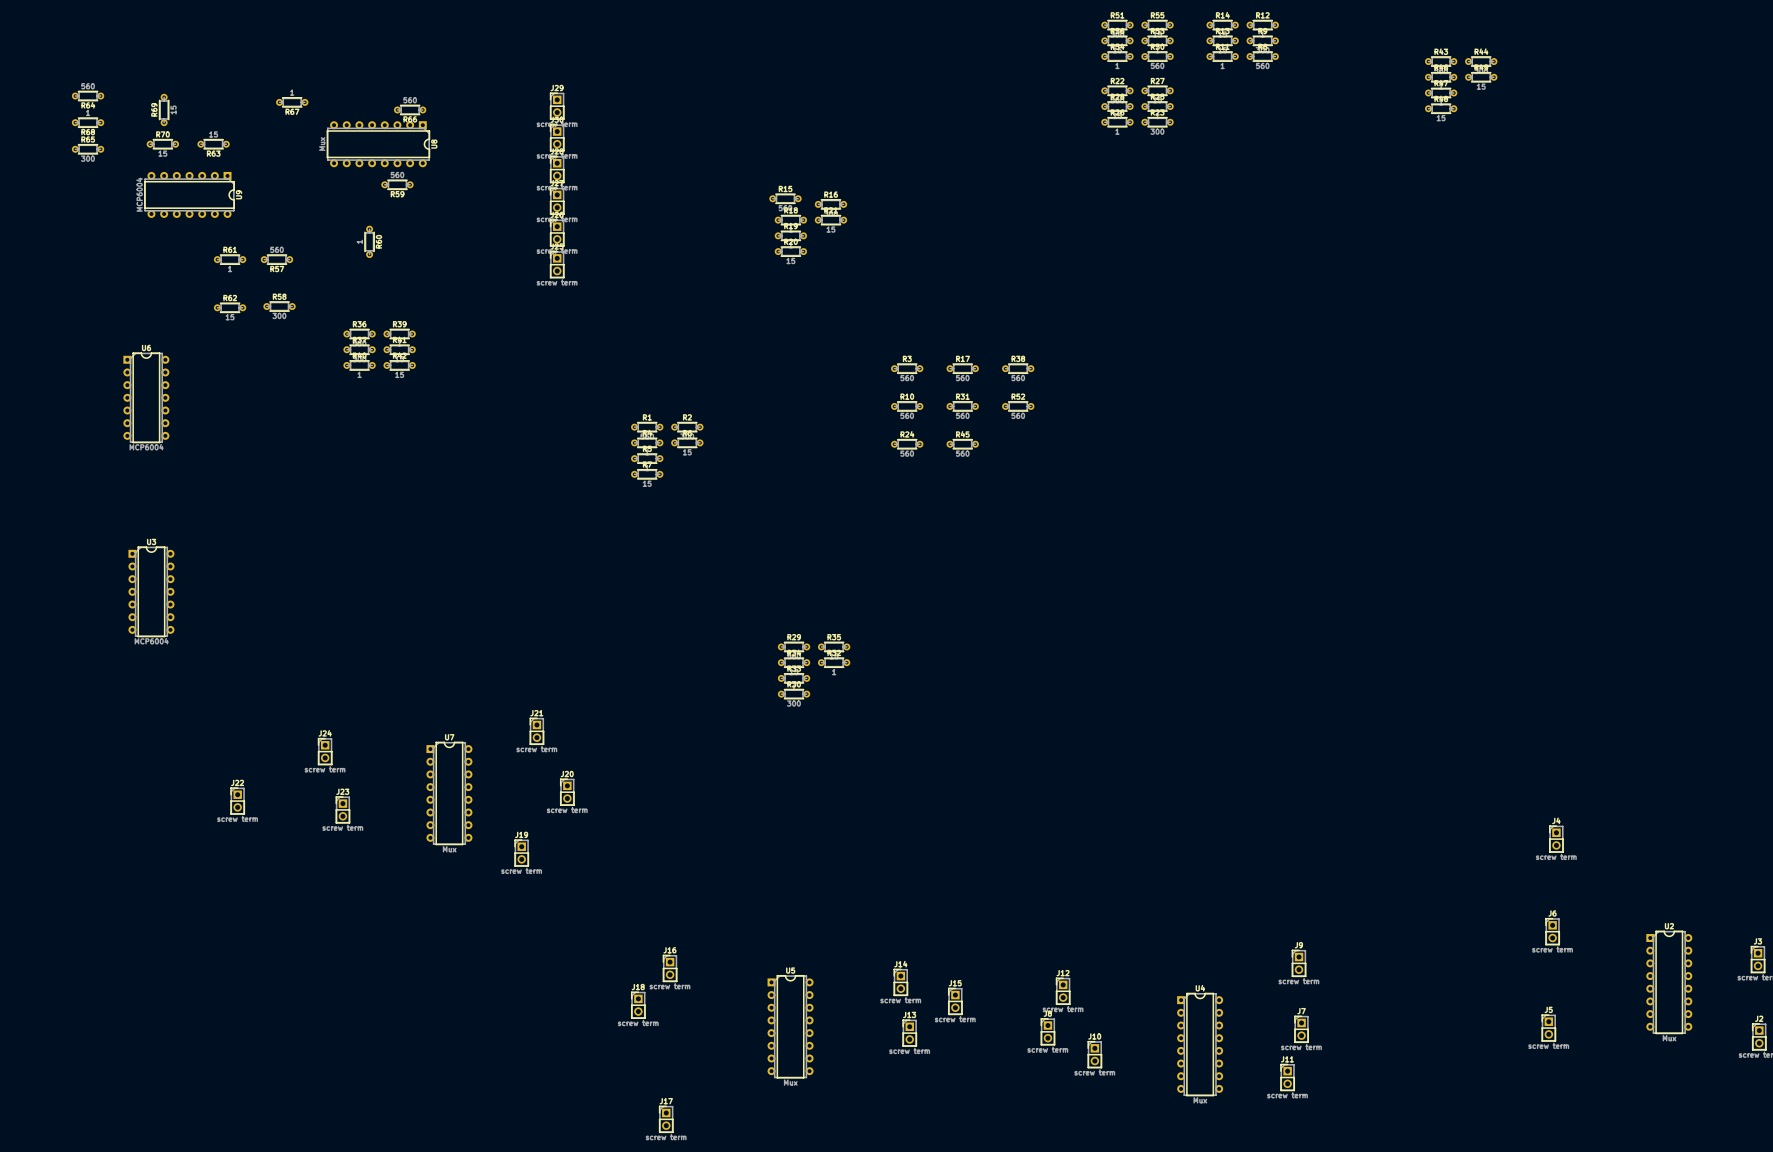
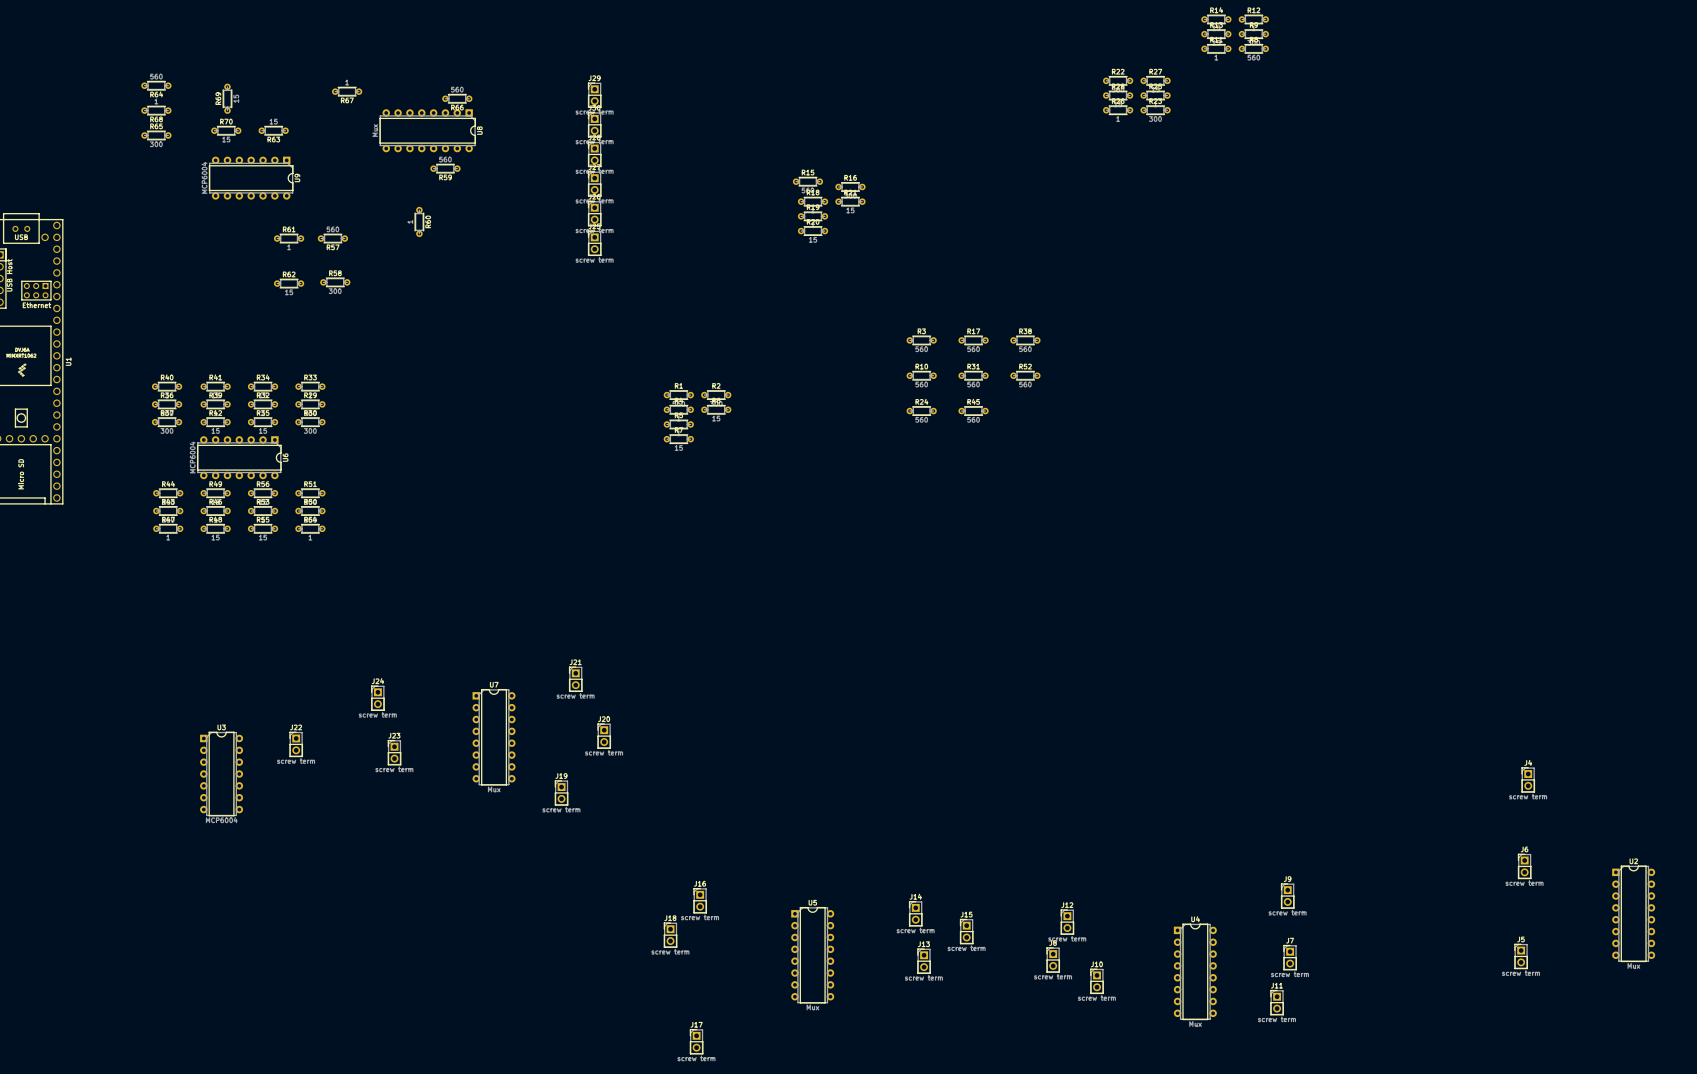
part position: (1117, 25) -> (310, 493)
part position: (1157, 25) -> (263, 528)
part position: (1117, 40) -> (263, 493)
part position: (1157, 40) -> (263, 511)
part position: (1117, 56) -> (310, 528)
part position: (1157, 56) -> (310, 511)
part position: (1441, 61) -> (168, 511)
part position: (1481, 61) -> (168, 493)
part position: (1441, 77) -> (215, 511)
part position: (1481, 77) -> (215, 493)
part position: (1441, 93) -> (168, 528)
part position: (1441, 108) -> (215, 528)
part position: (359, 334) -> (167, 404)
part position: (399, 334) -> (215, 404)
part position: (359, 349) -> (167, 422)
part position: (399, 349) -> (215, 386)
part position: (359, 365) -> (167, 386)
part position: (399, 365) -> (215, 422)
part rotation: 0° (146, 397) -> 90° clockwise (239, 457)
part position: (146, 397) -> (239, 457)
part position: (151, 591) -> (221, 774)
part position: (794, 646) -> (310, 404)
part position: (834, 646) -> (263, 422)
part position: (794, 662) -> (263, 386)
part position: (834, 662) -> (263, 404)
part position: (794, 678) -> (310, 386)
part position: (794, 694) -> (310, 422)

